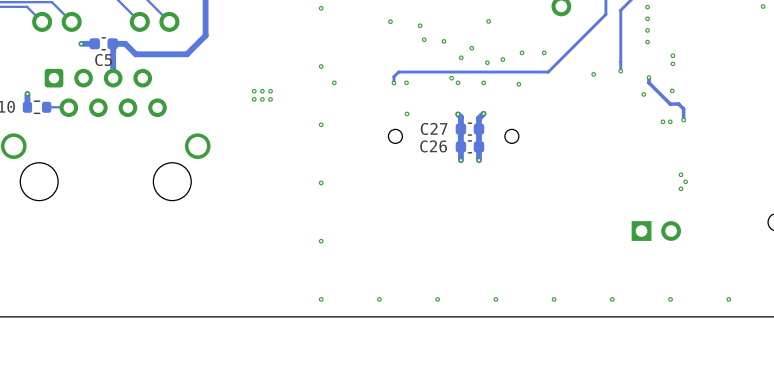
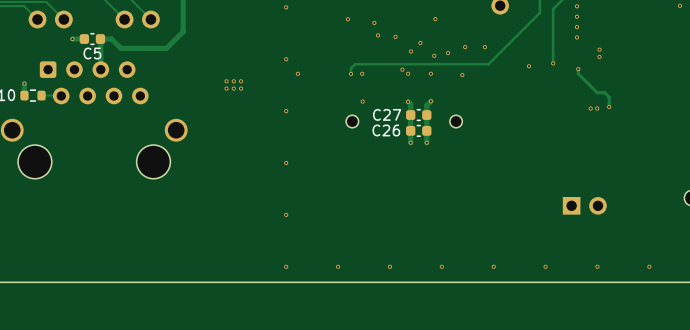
via: (672, 90) -> none
via: (643, 94) -> none
via: (681, 174) -> none
via: (685, 181) -> none
via: (681, 188) -> none

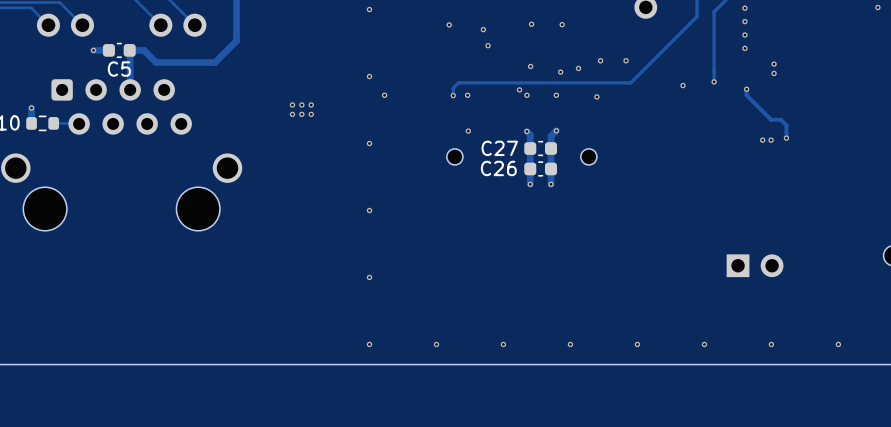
via: none -> (531, 24)
via: (395, 36) -> none
via: (420, 42) -> none

